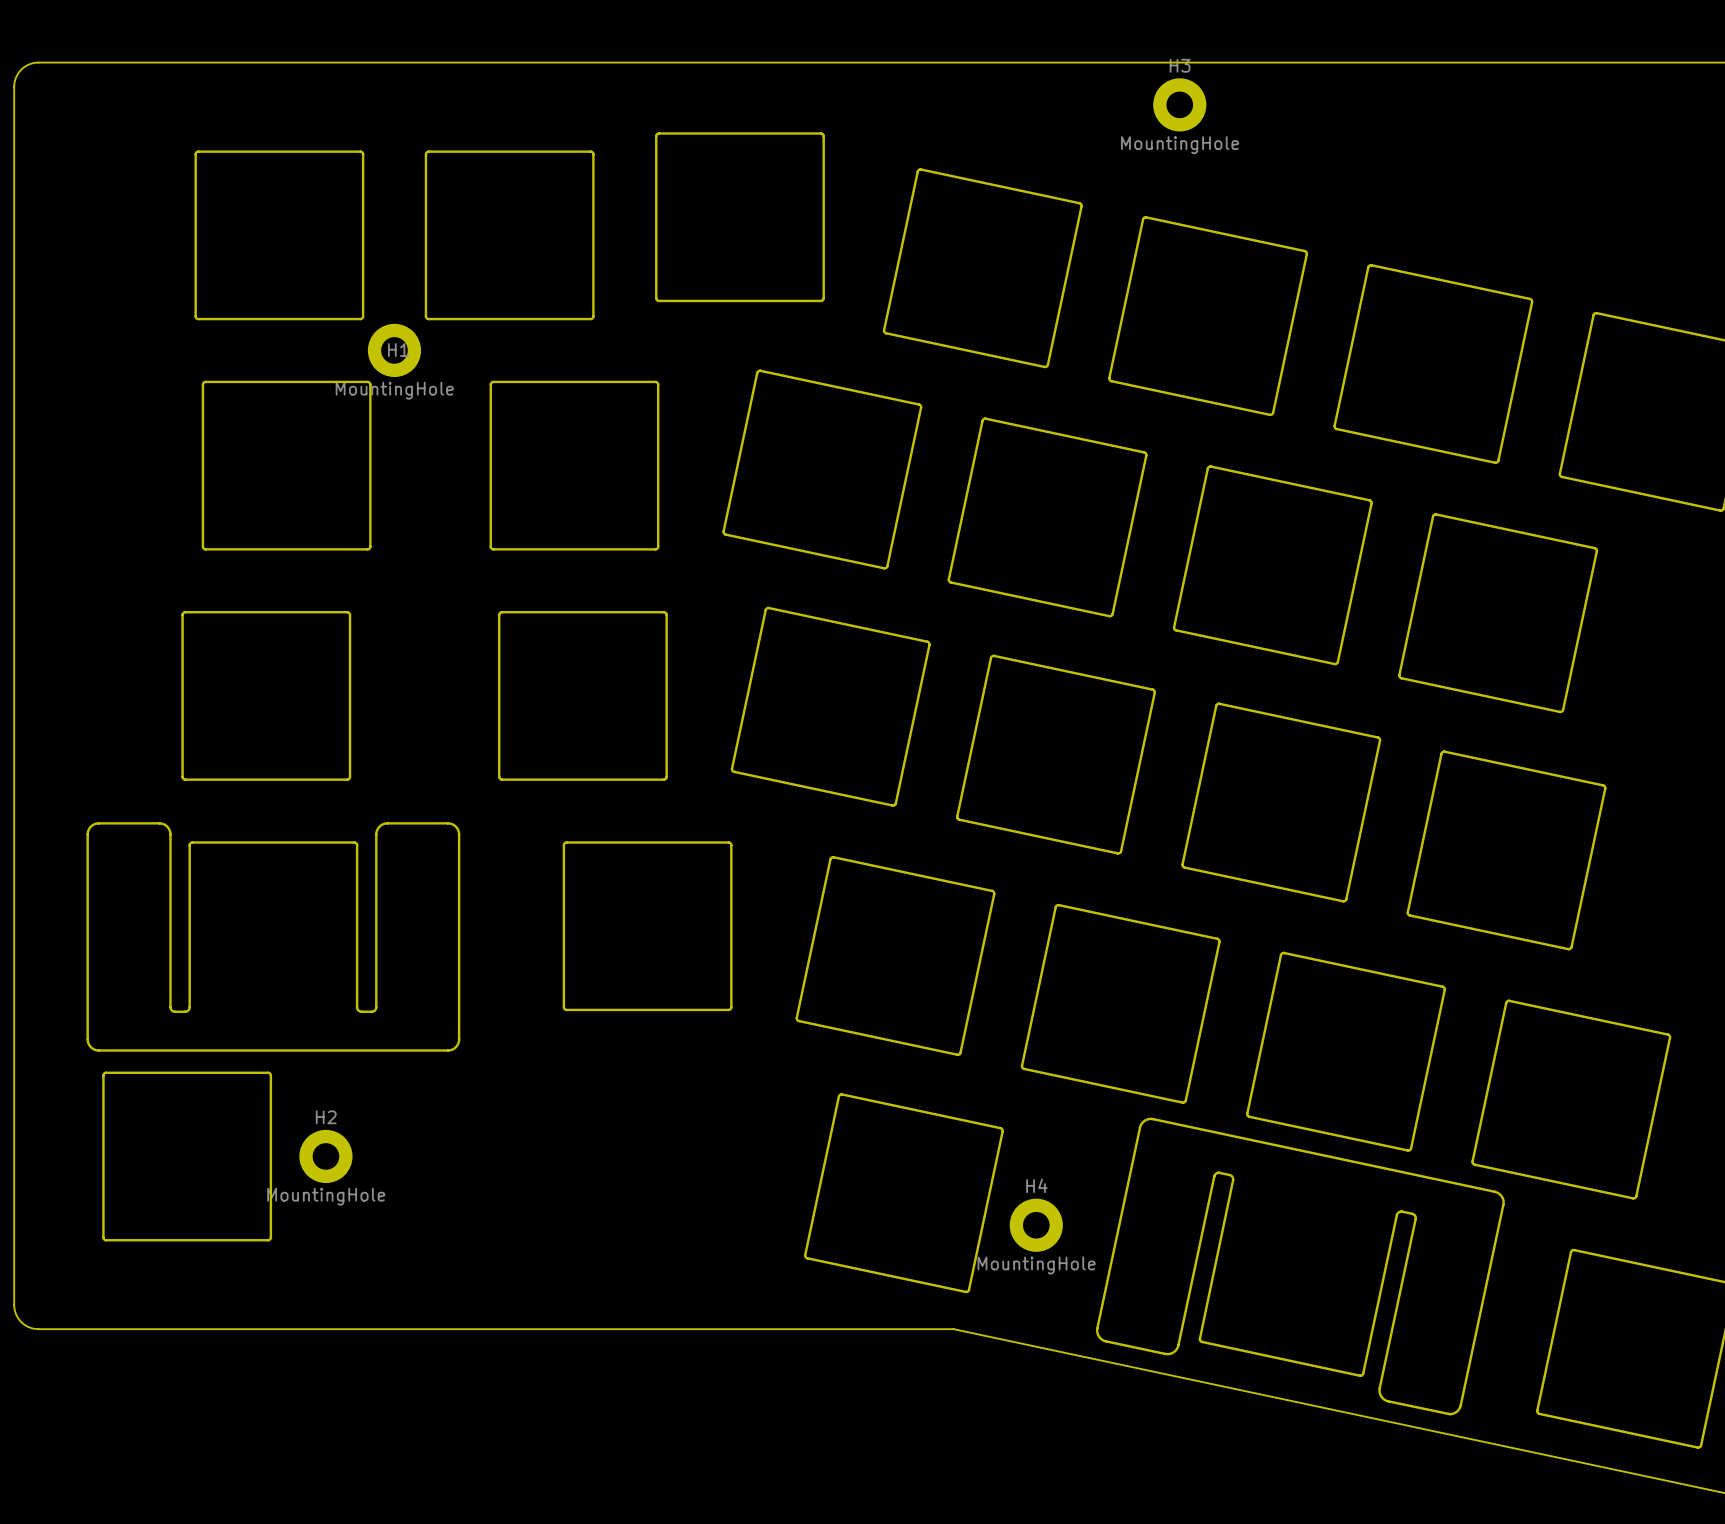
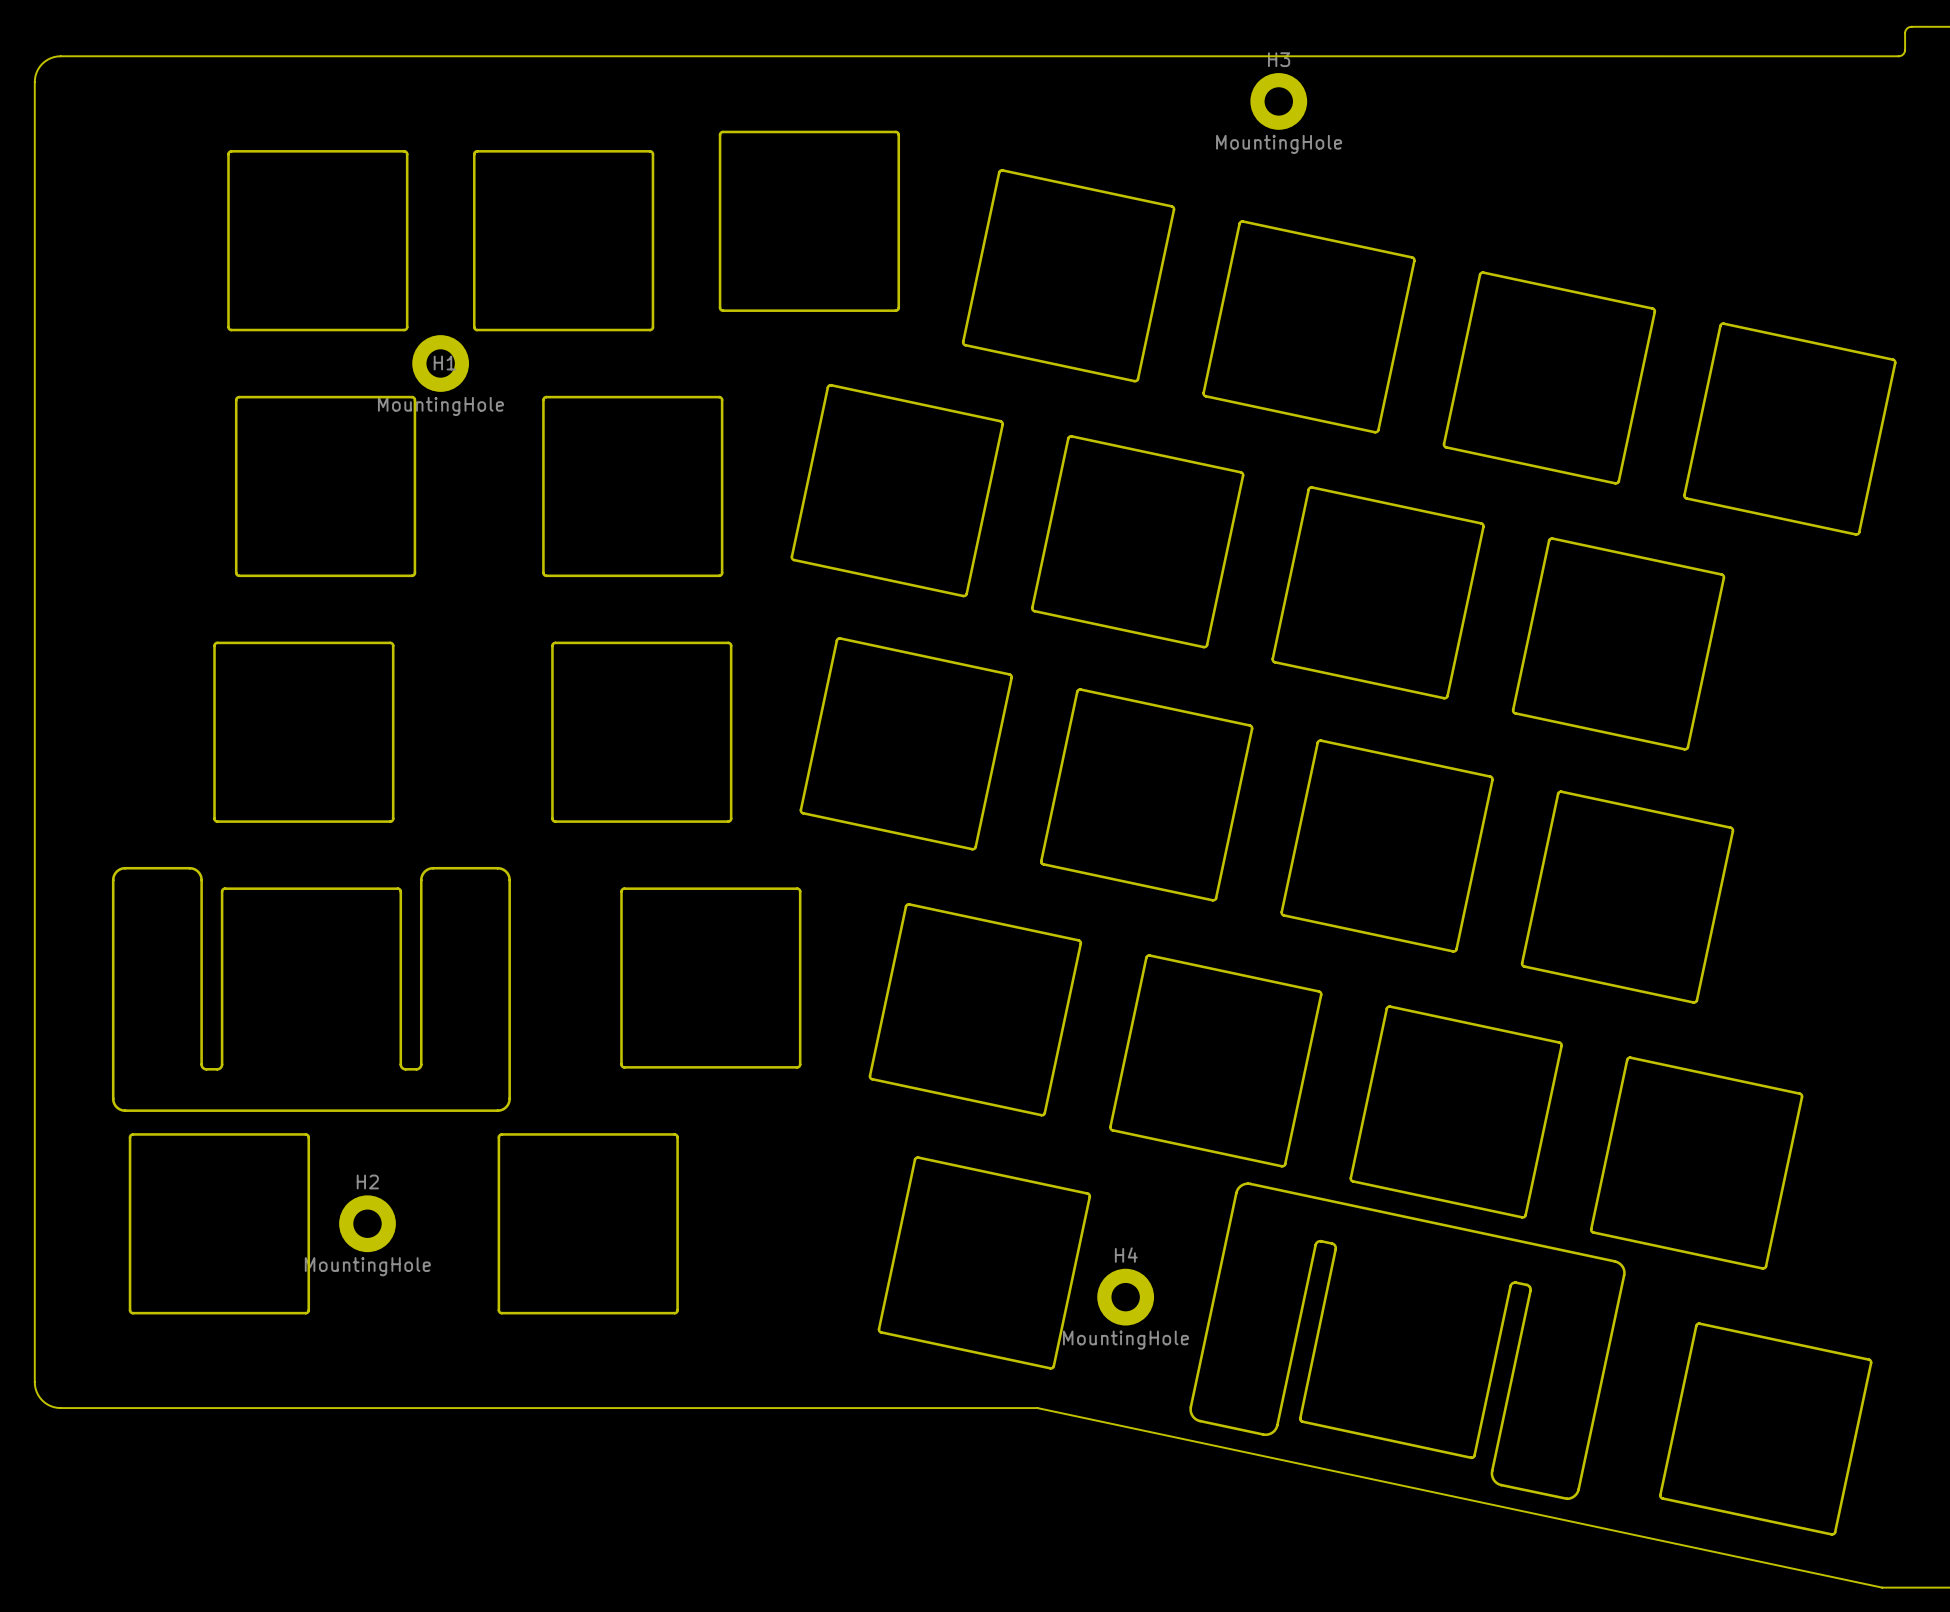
board edge: none -> (501, 1134) (676, 1135) (676, 1312) (499, 1312) (498, 1137) (501, 1134)

